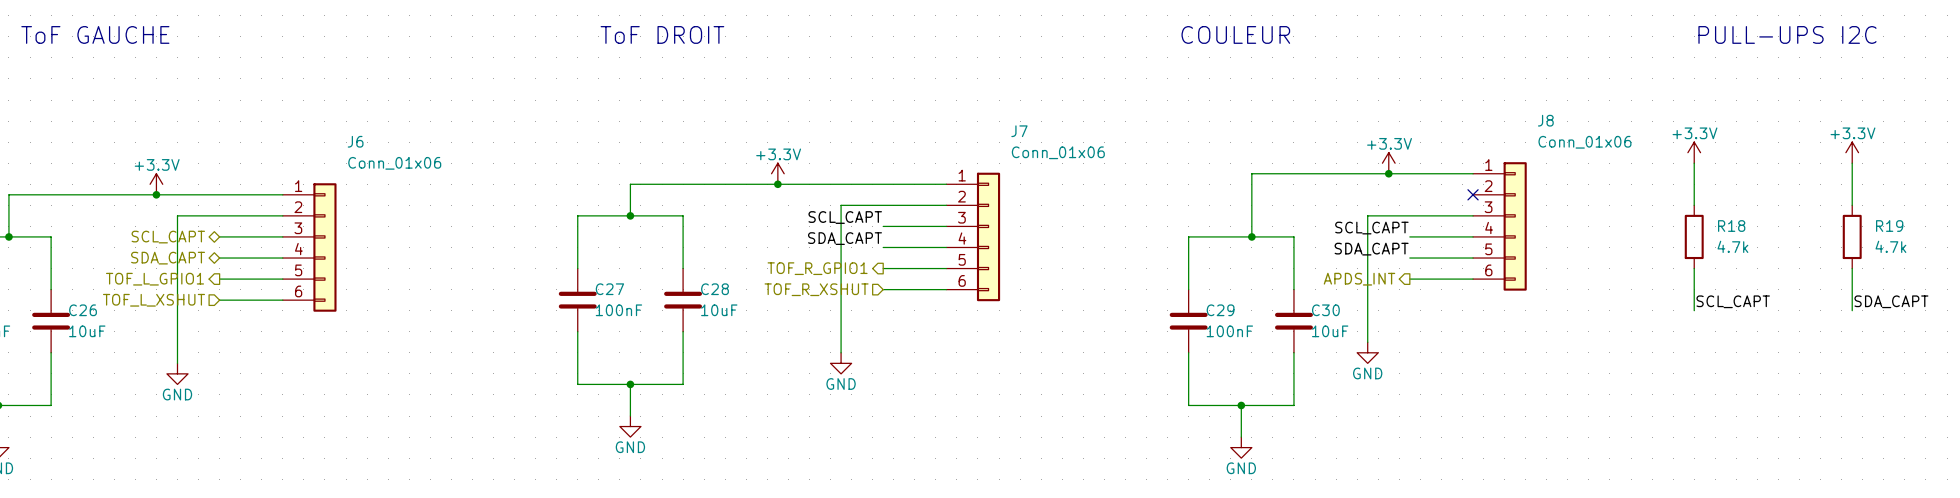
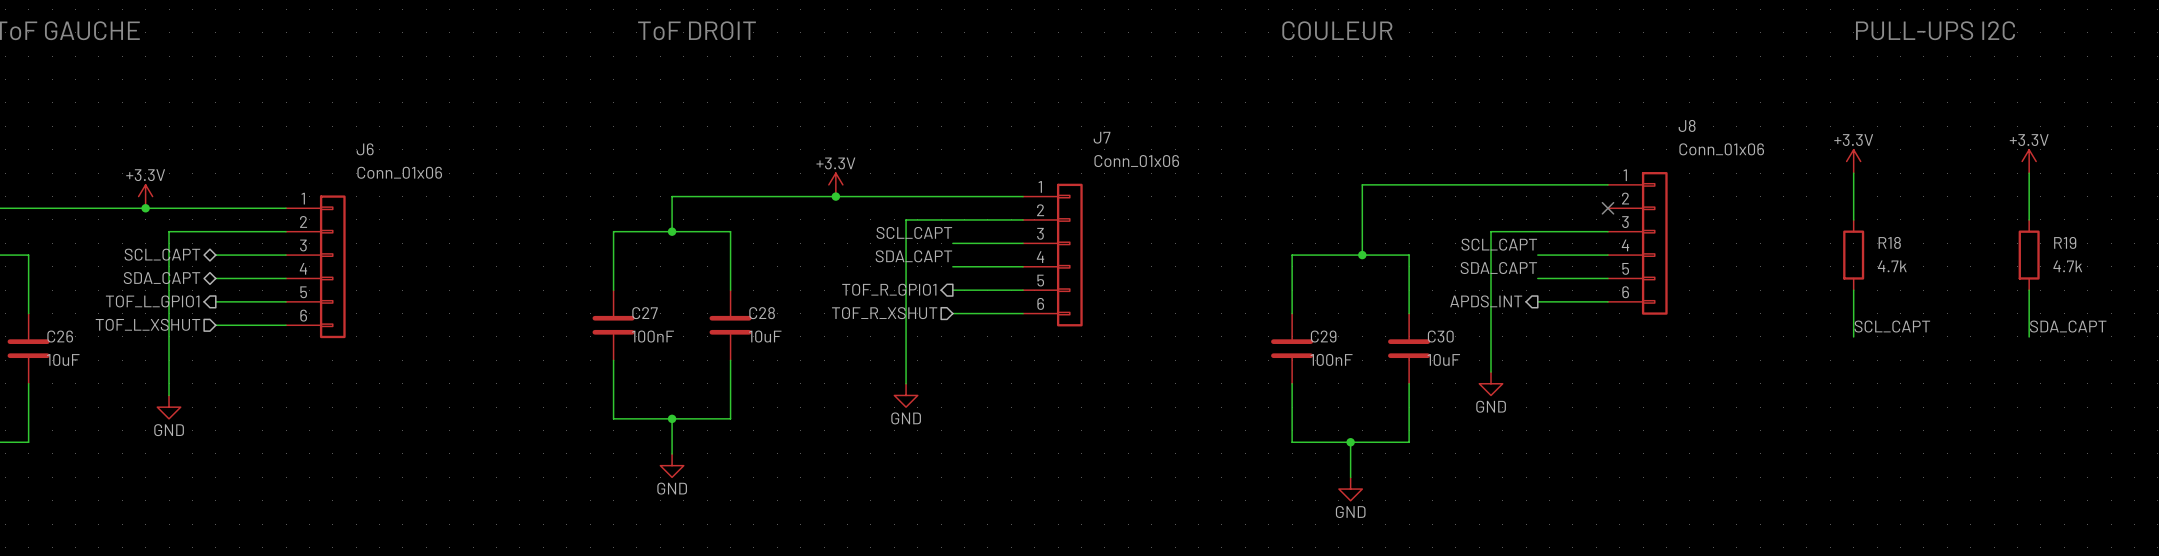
power symbol: +3.3V (1388, 163) -> none
junction: (1388, 173) -> none

